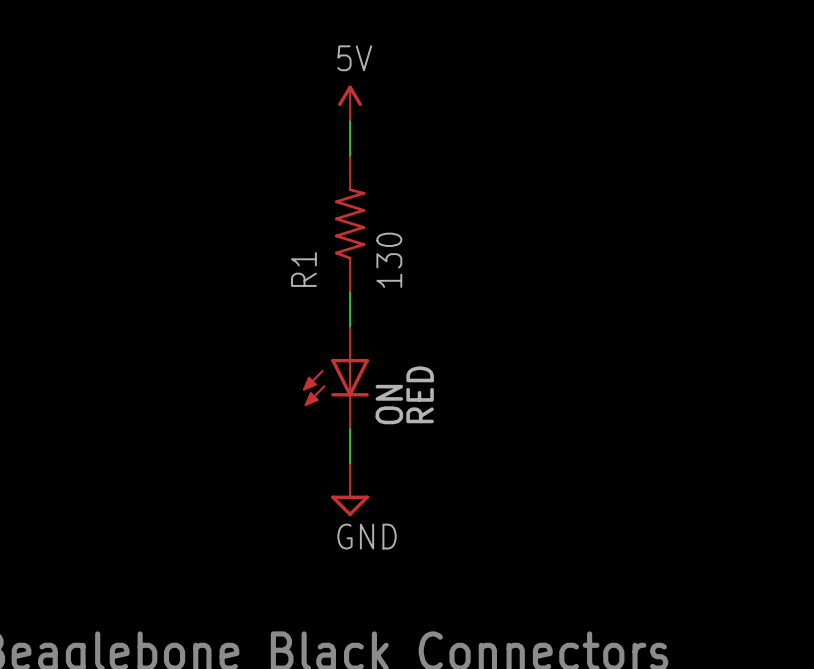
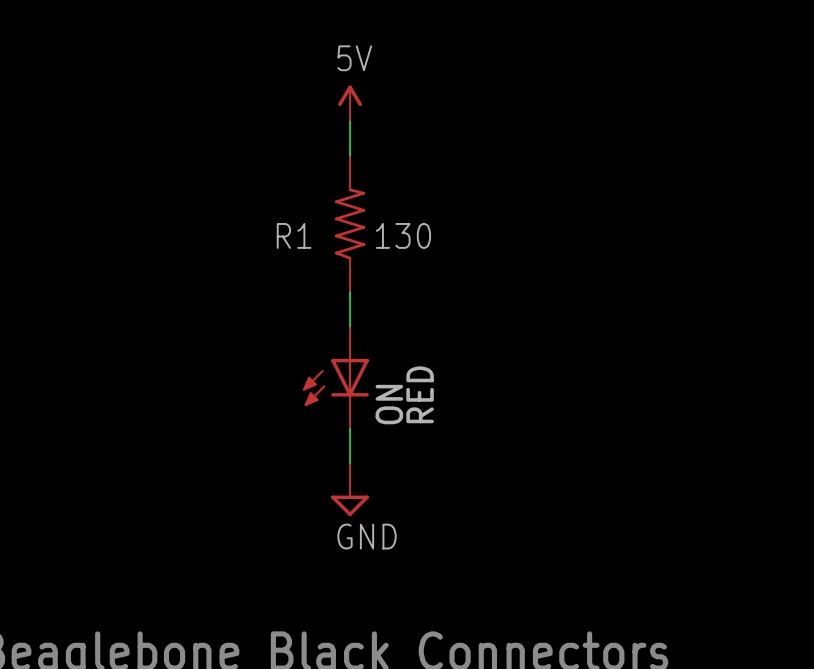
R1 value rotation: 0° (389, 260) -> 90° clockwise (403, 235)
R1 name rotation: 0° (303, 269) -> 90° clockwise (294, 235)

